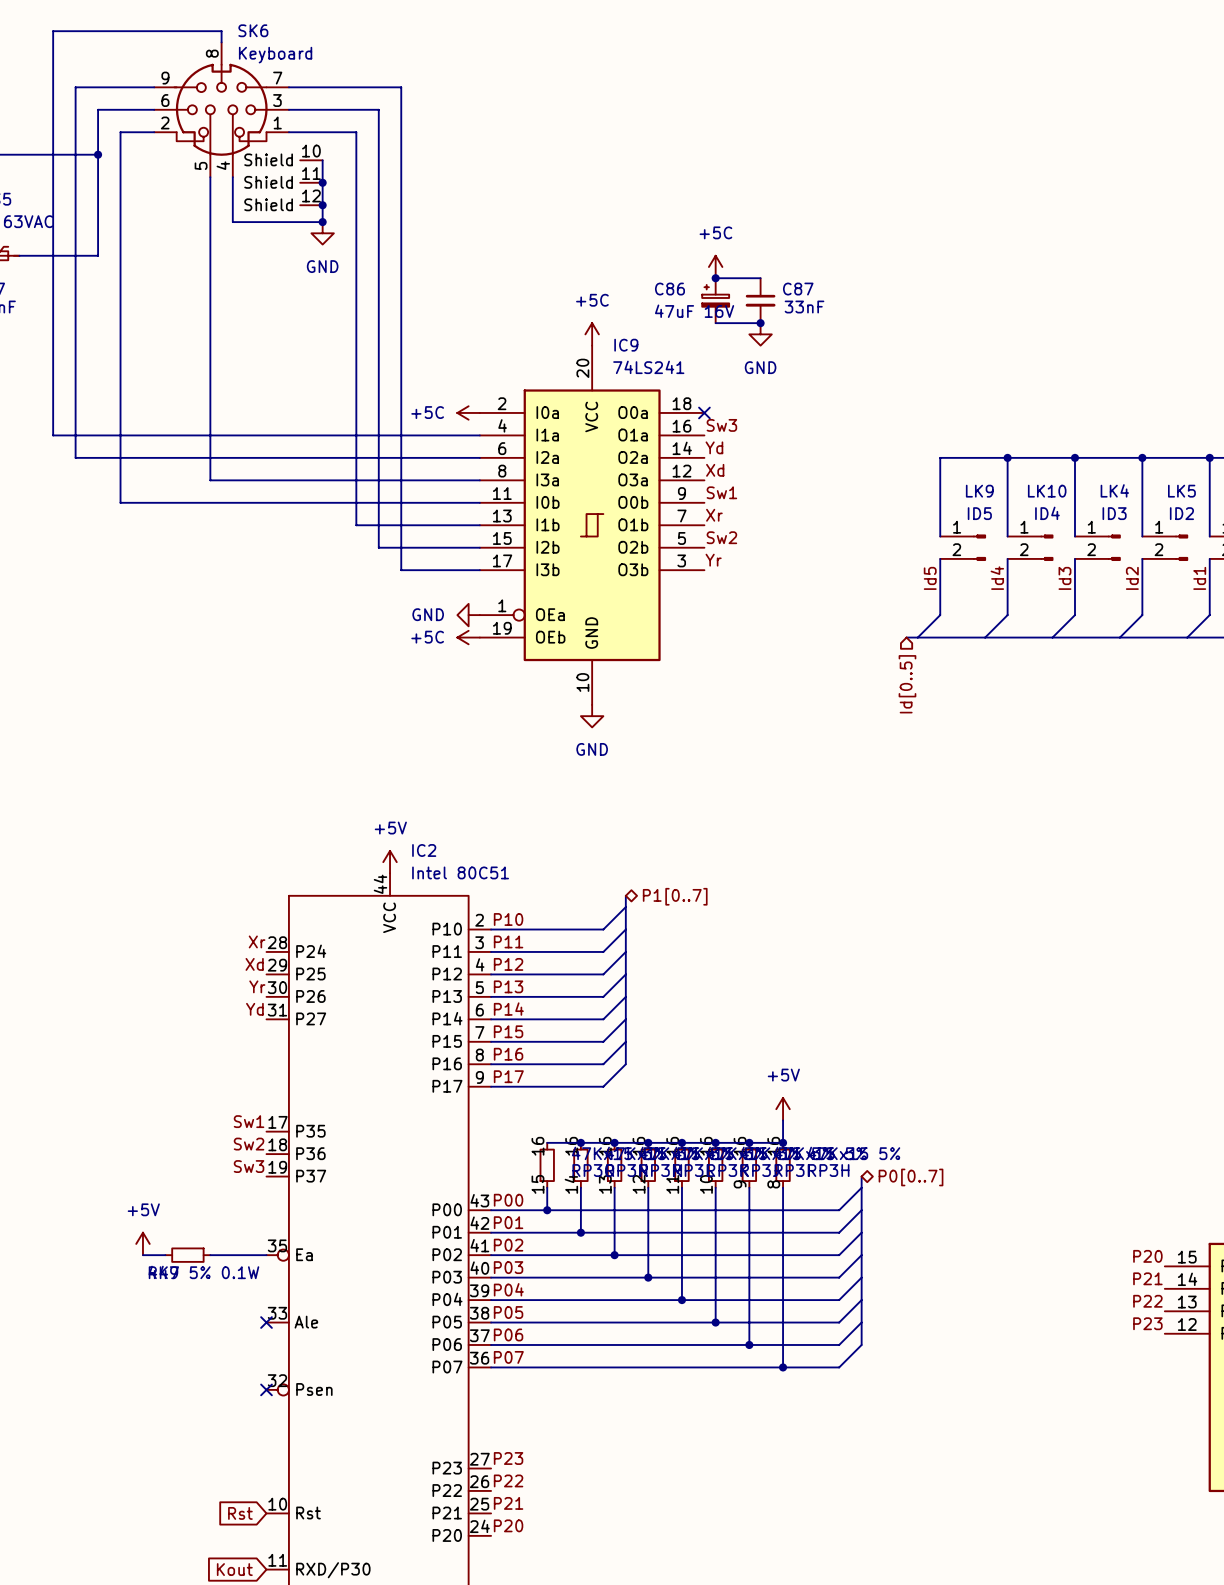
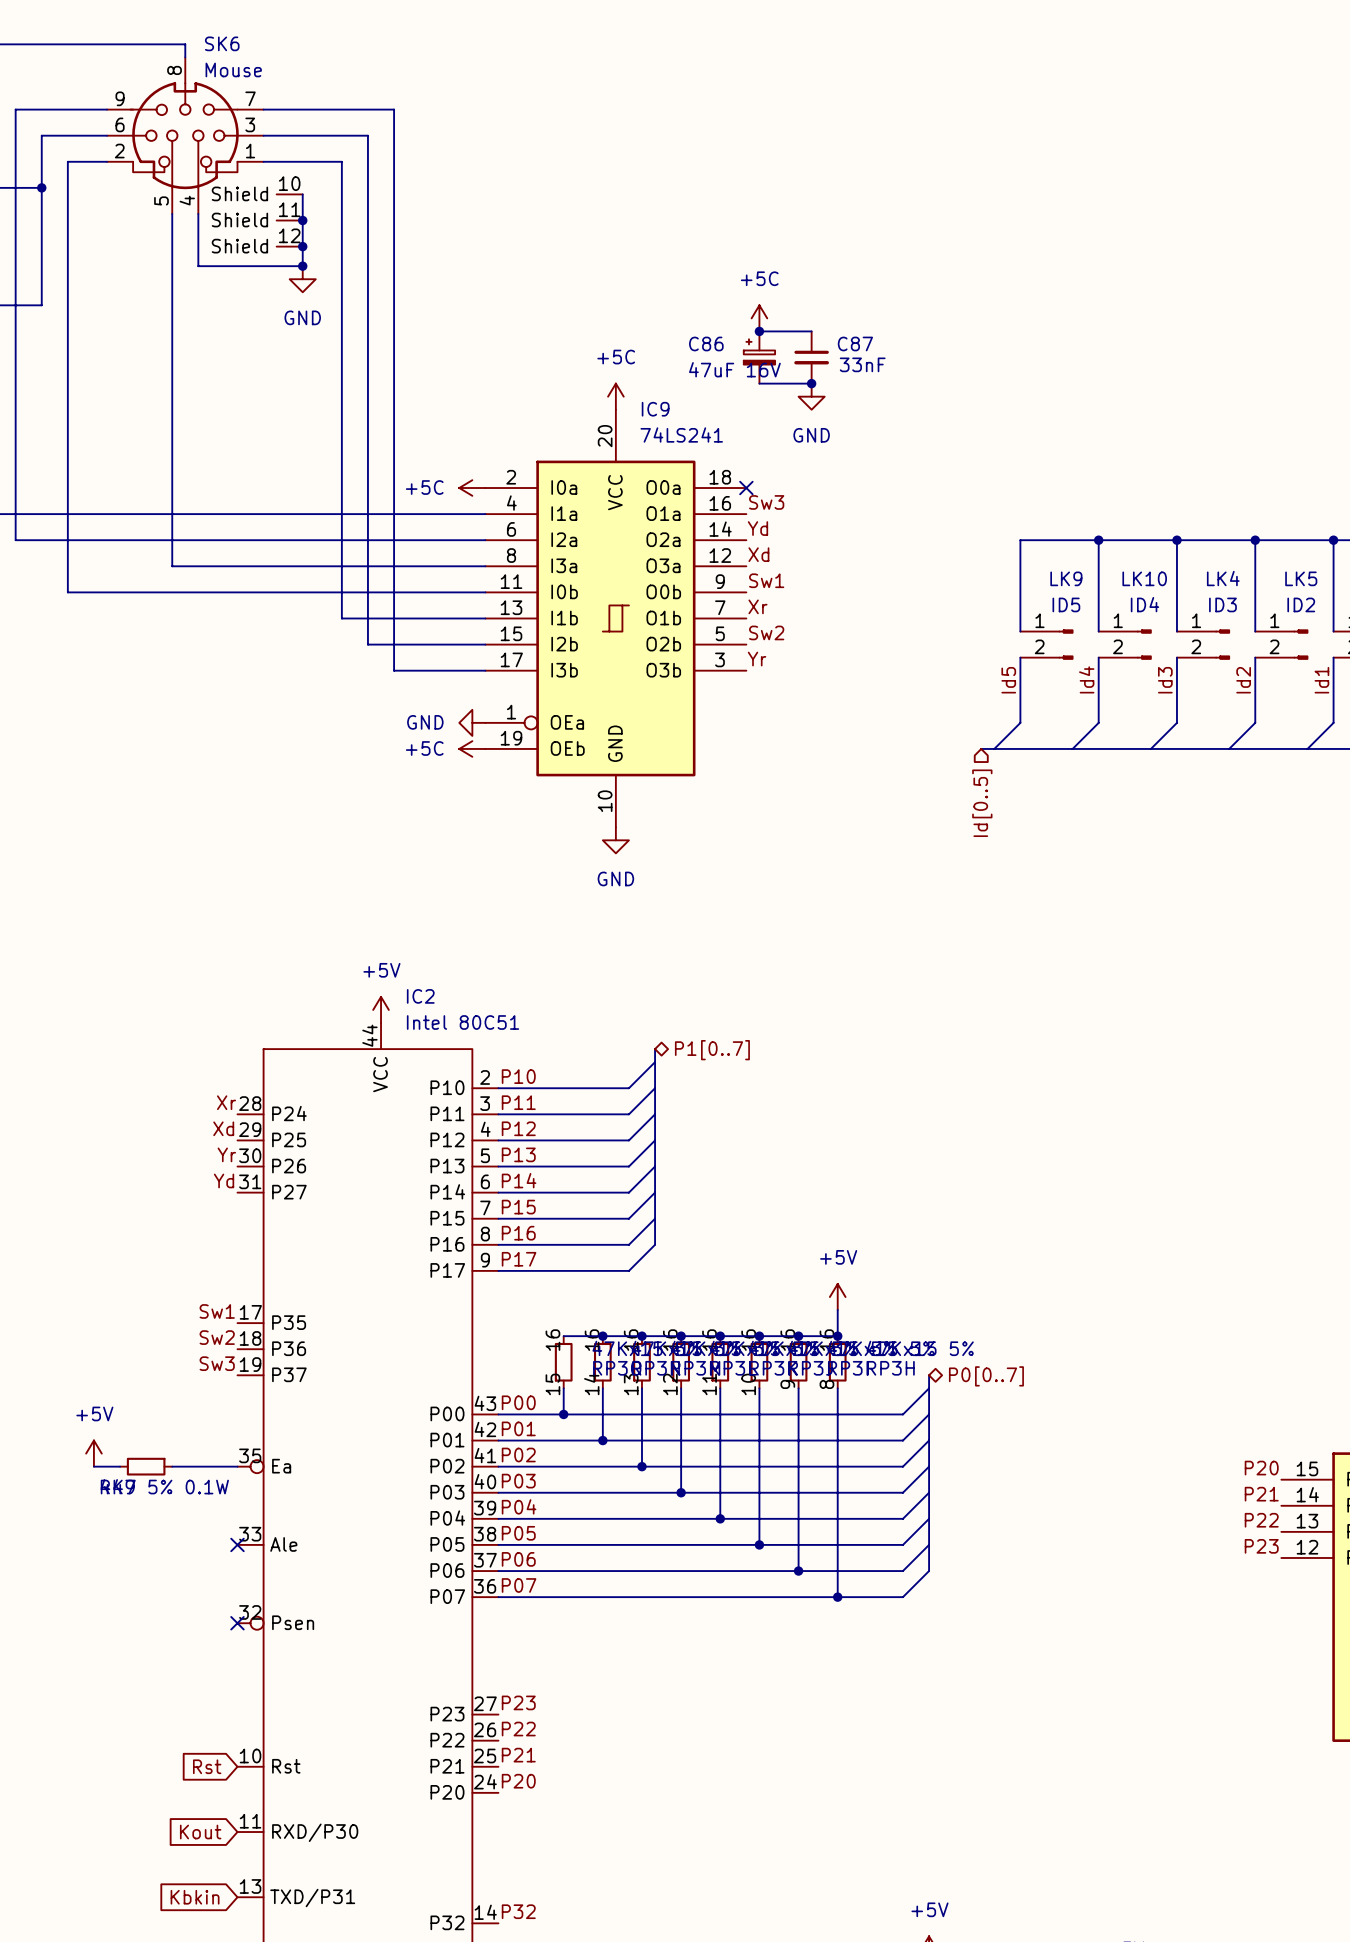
SK6 value: Keyboard (275, 55) -> Mouse (233, 69)

